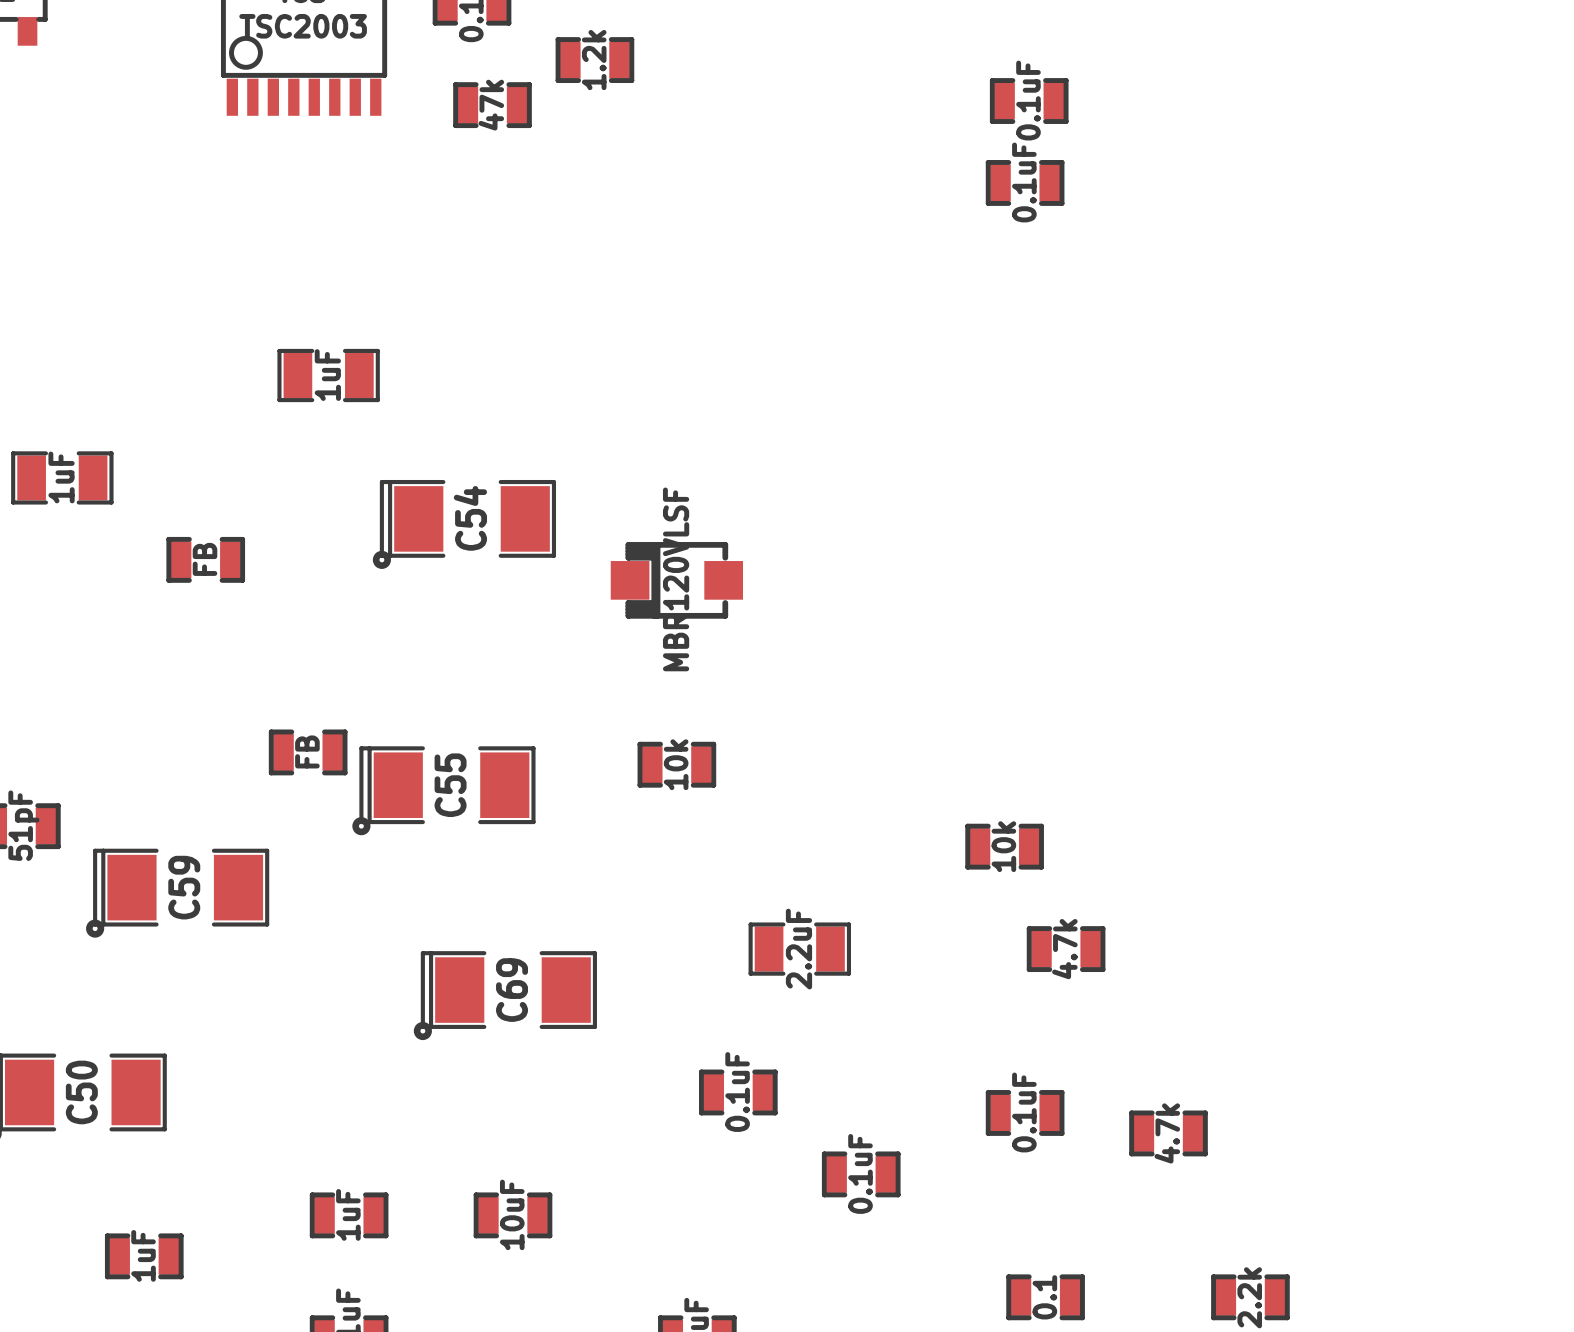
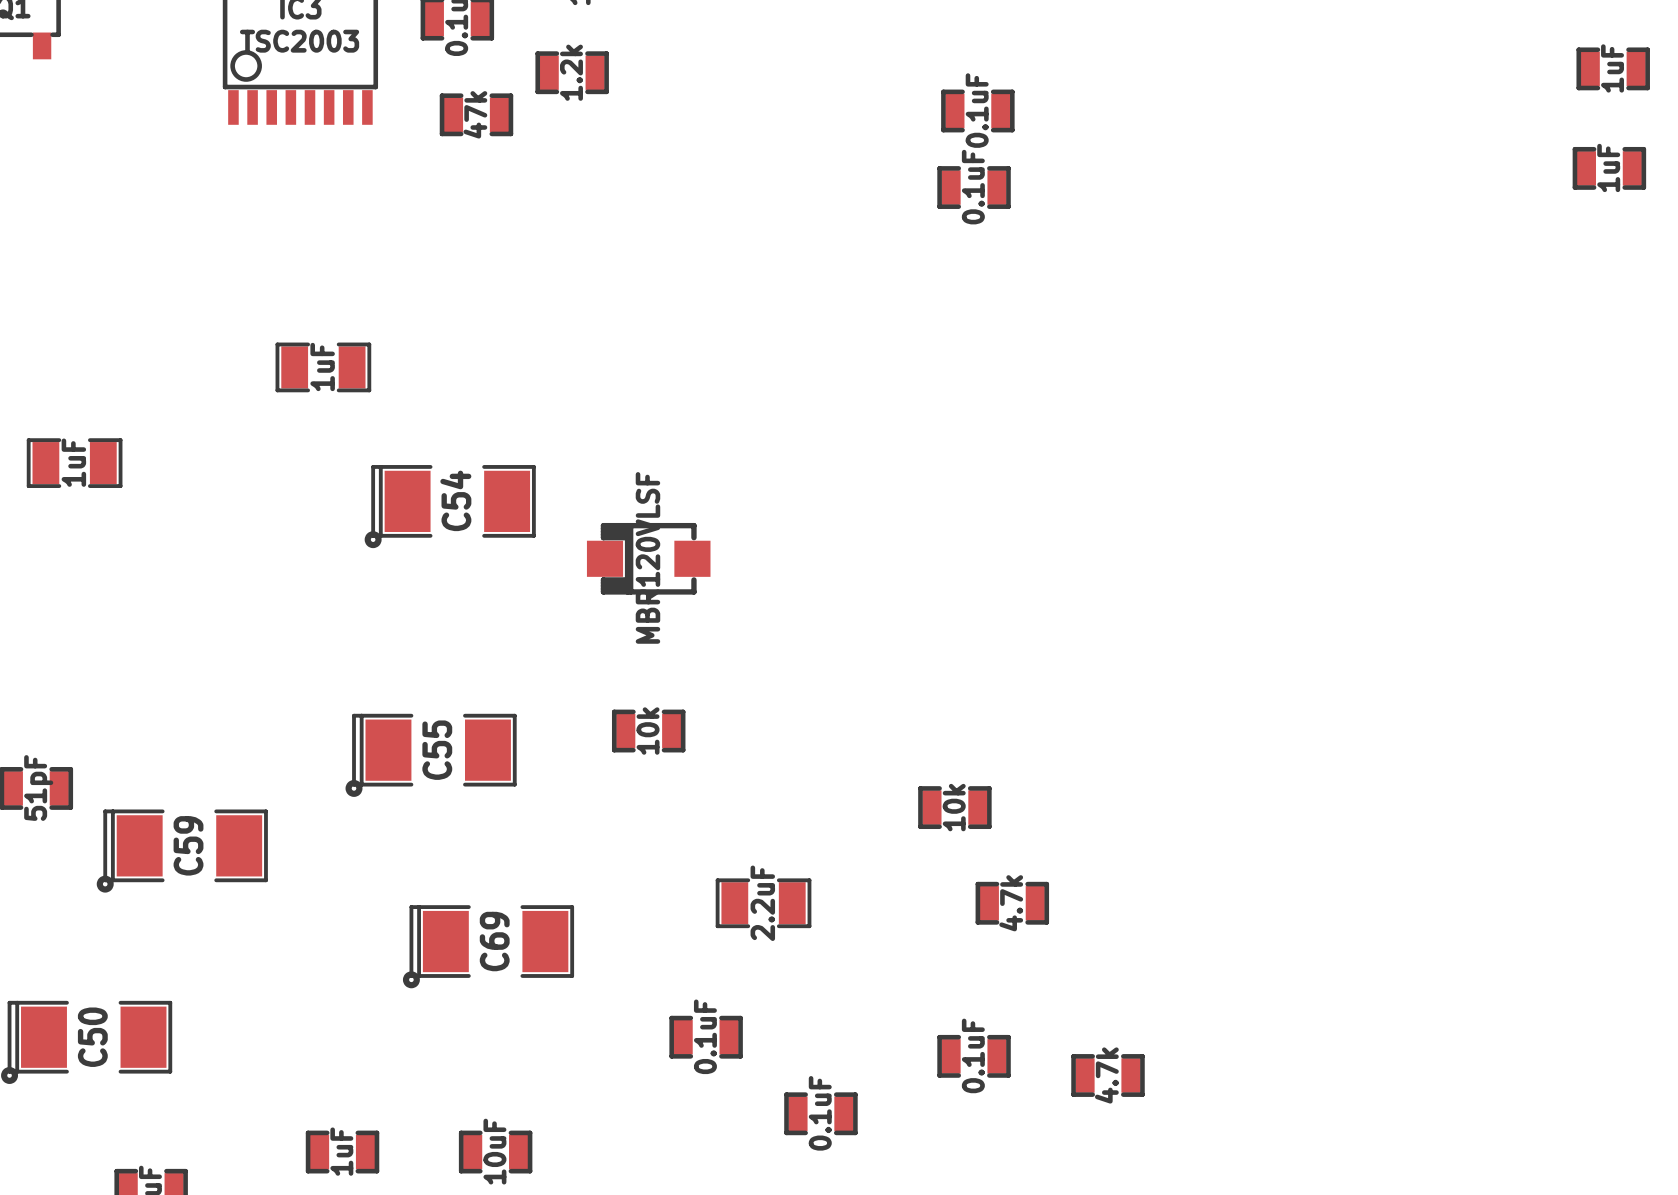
part: FB (205, 559) -> none
part: FB (308, 752) -> none

